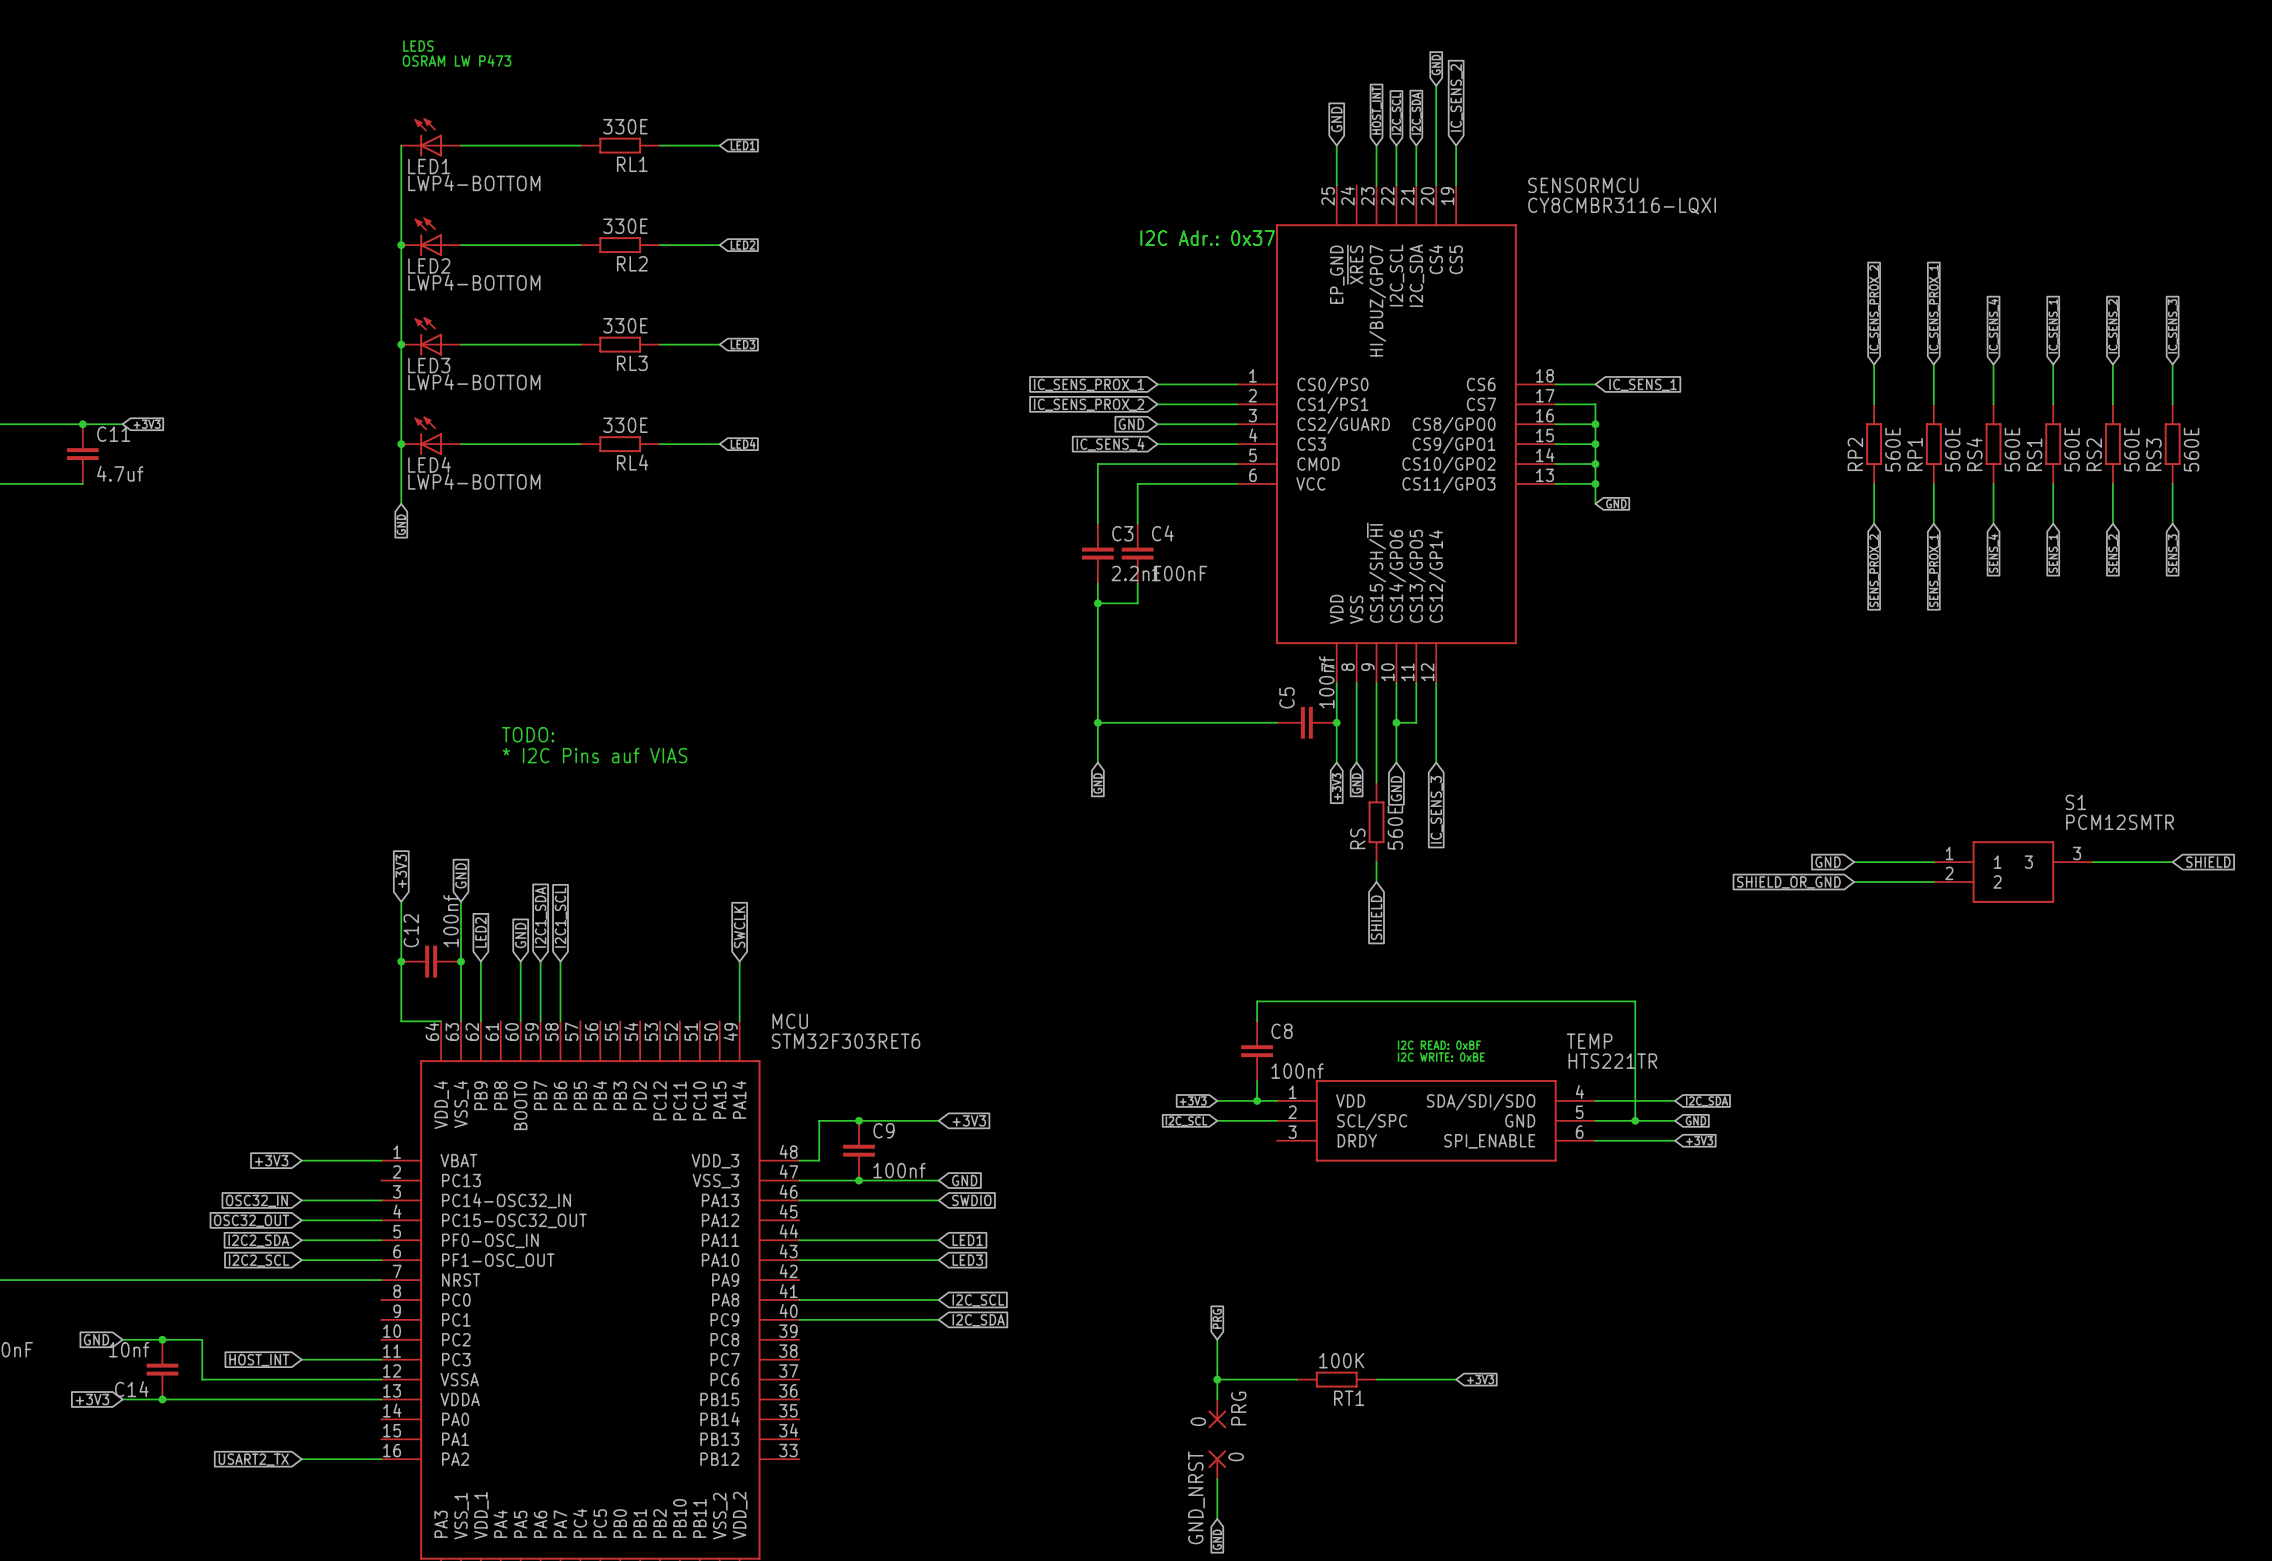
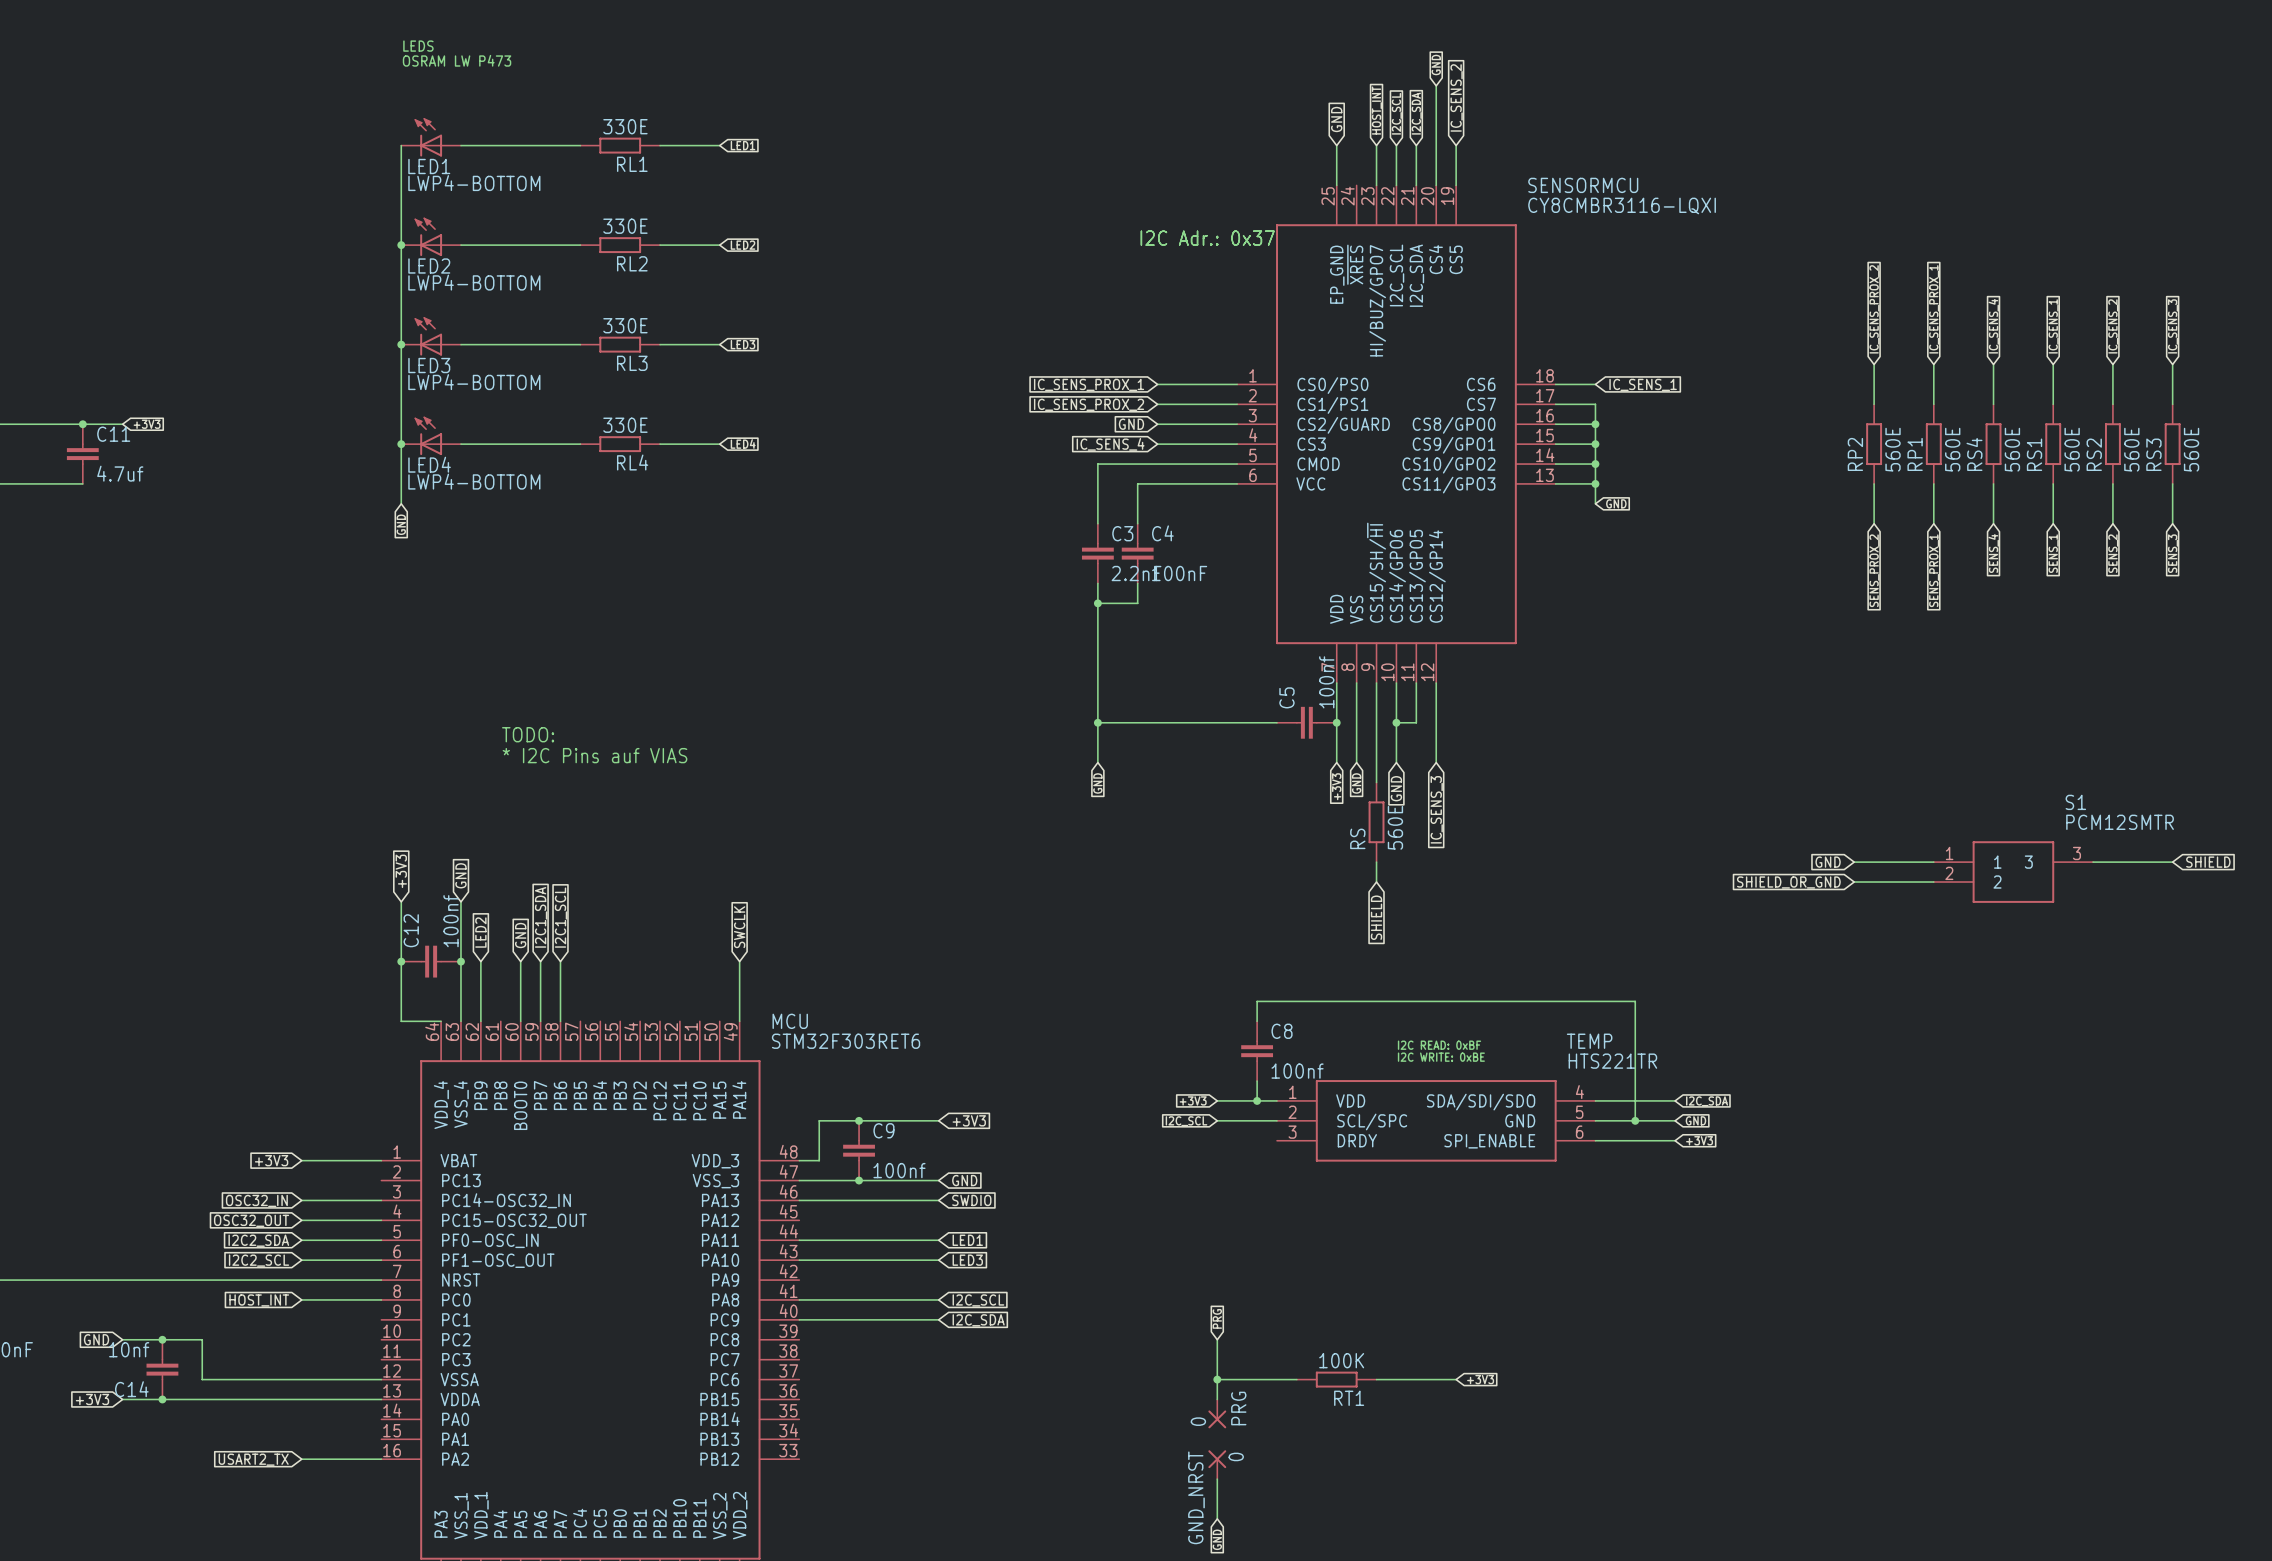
wire: (301, 1359) (381, 1359) -> (301, 1299) (381, 1299)
global label position: HOST_INT (259, 1360) -> HOST_INT (259, 1300)

